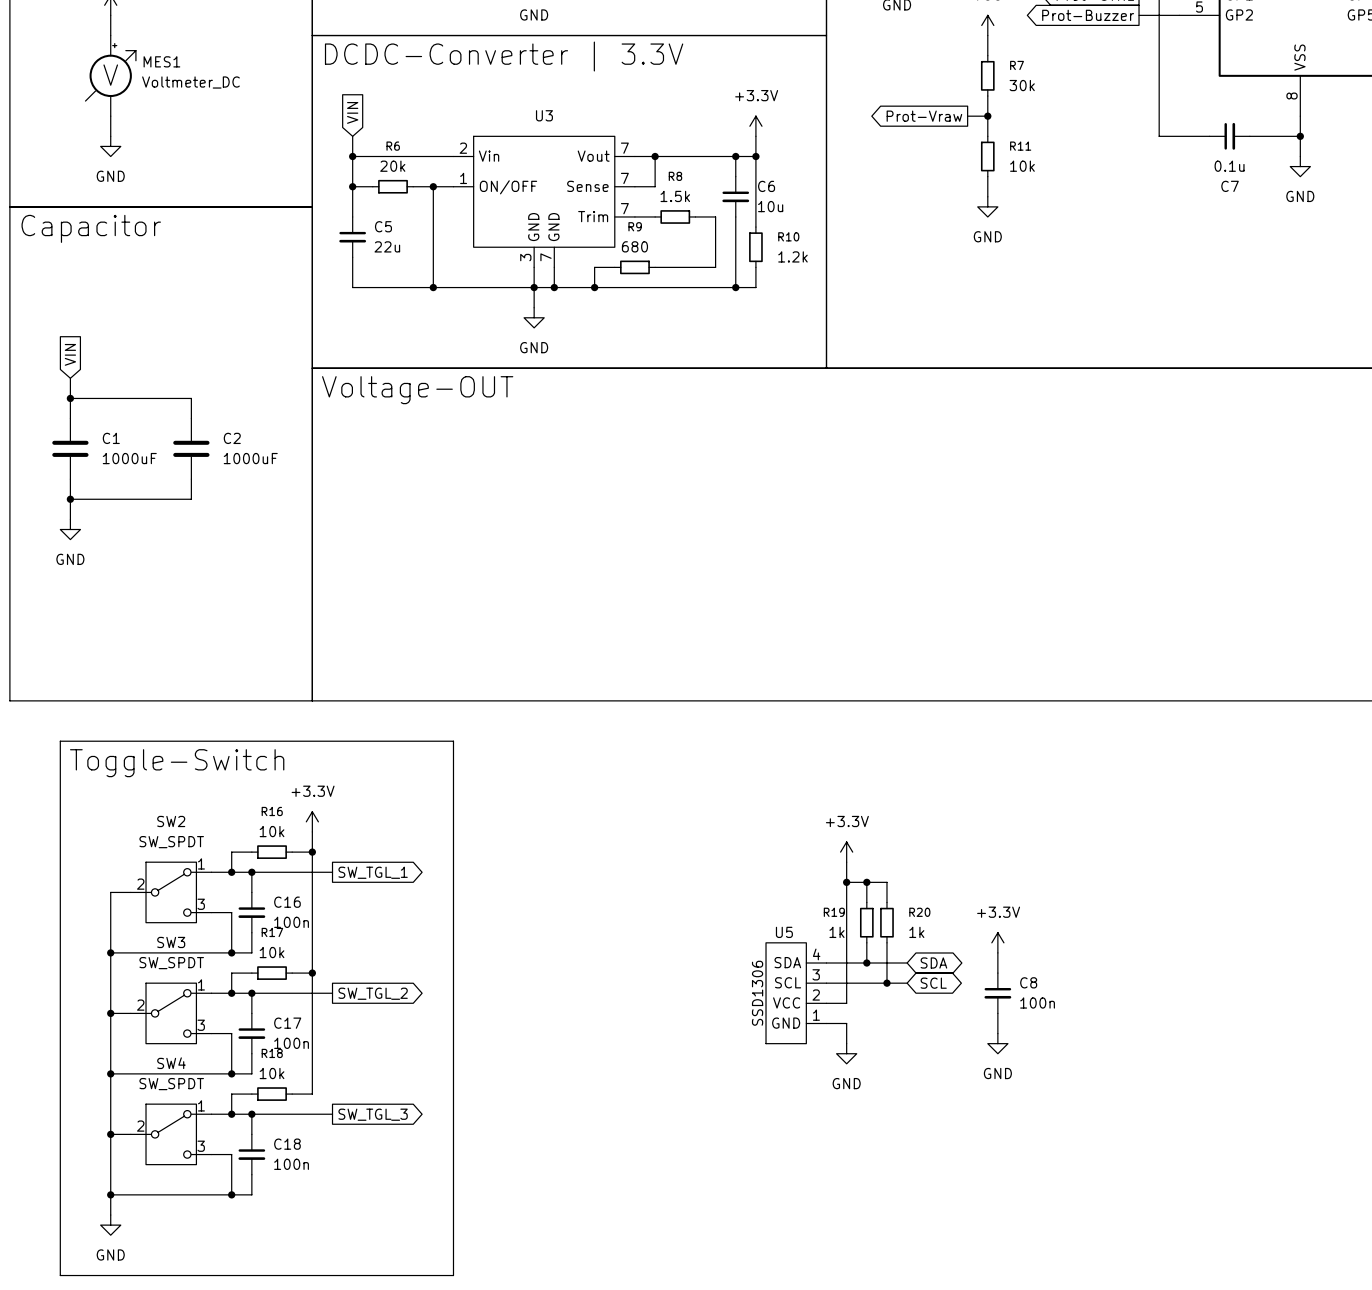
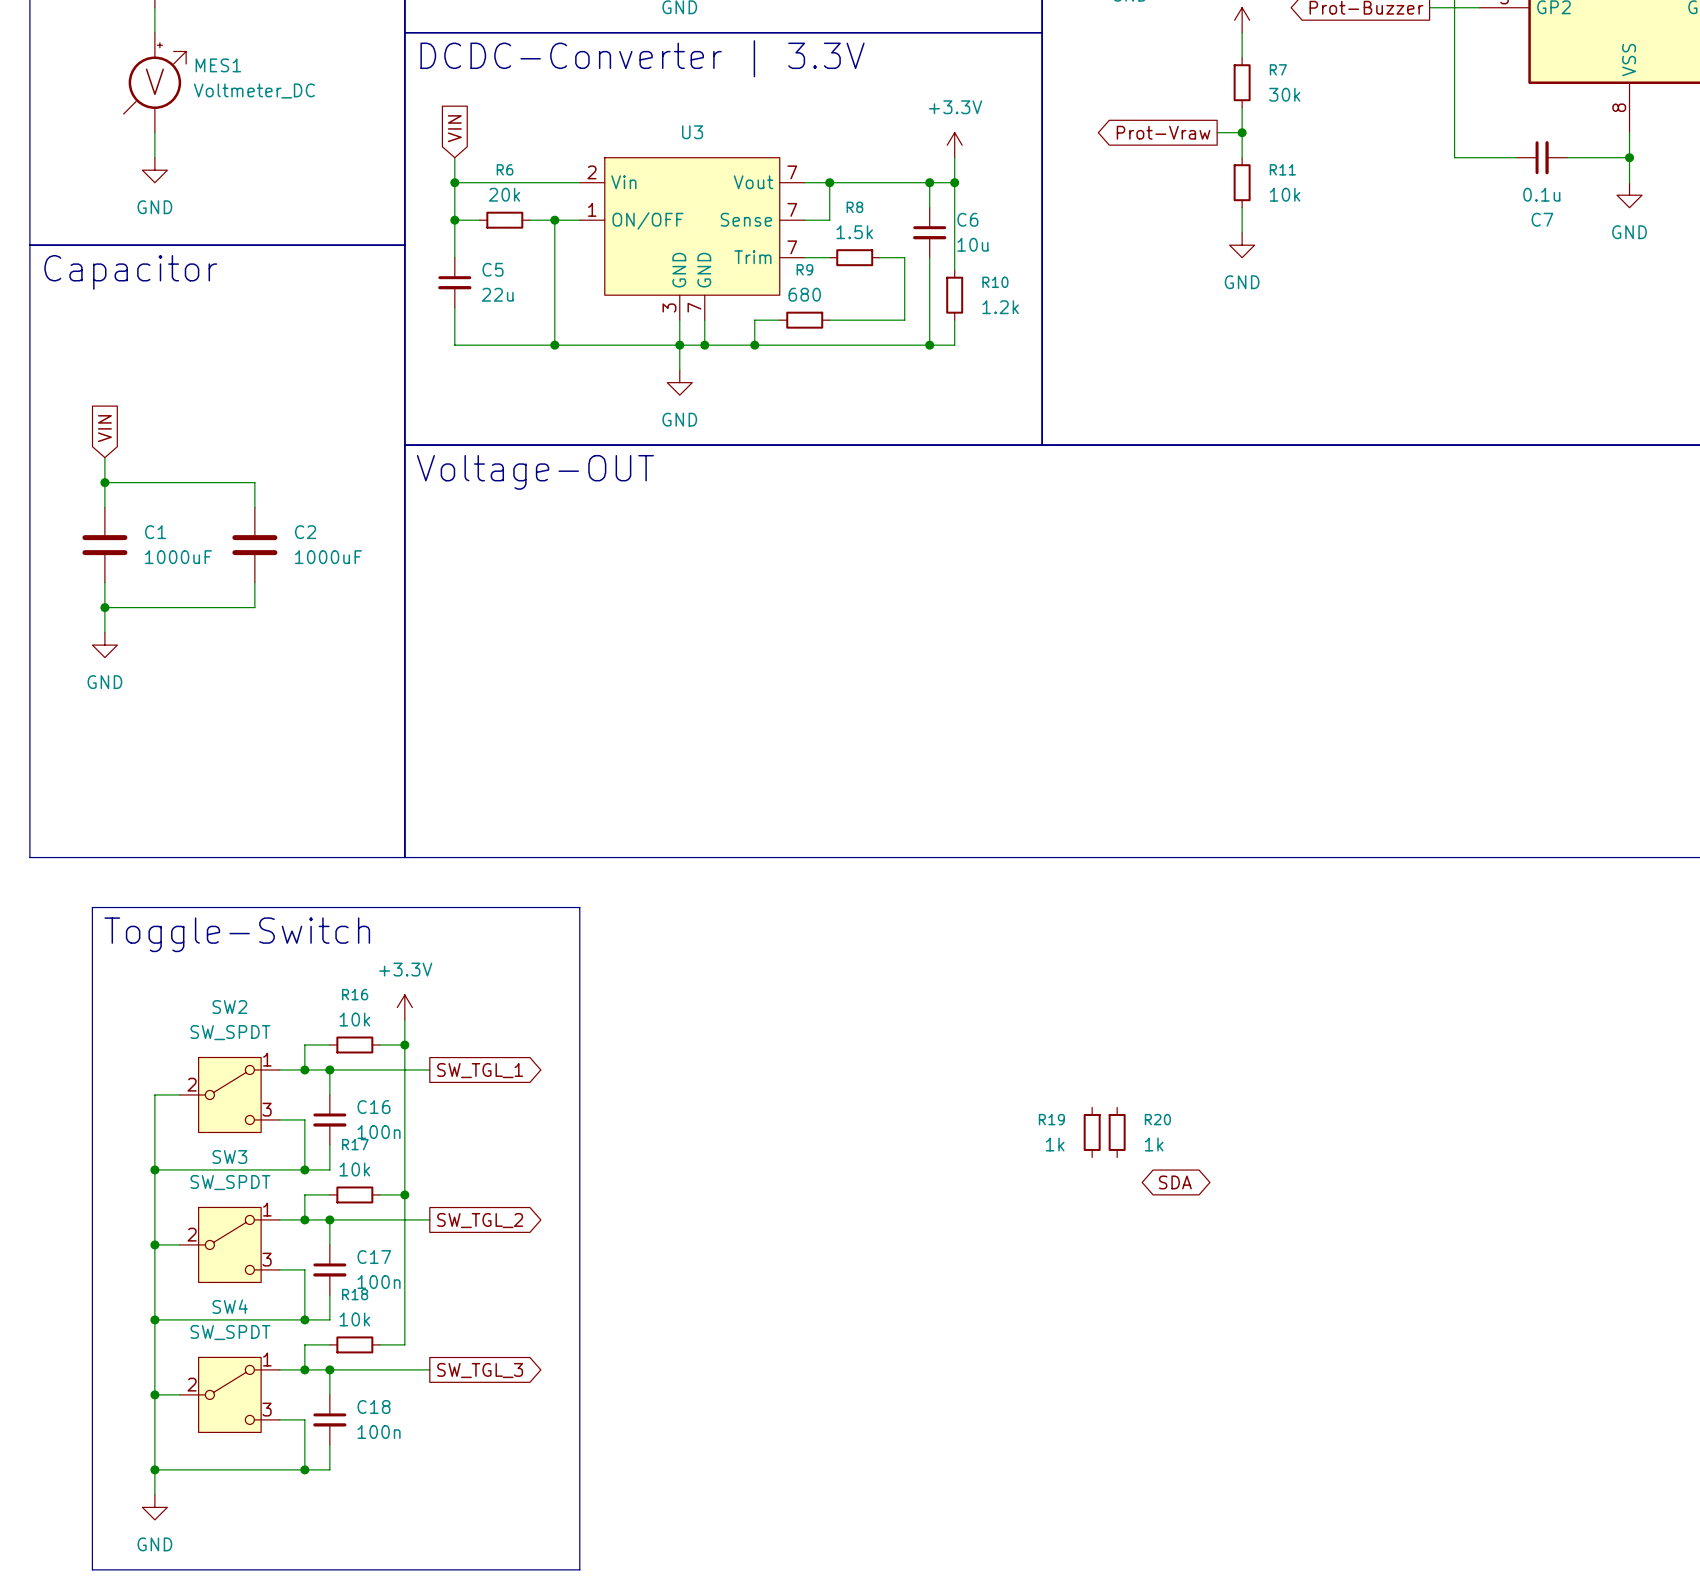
power symbol: +3.3V (846, 852) -> none
wire: (846, 862) (846, 1003) (826, 1003) -> none
wire: (846, 882) (886, 882) (886, 902) -> none
junction: (846, 882) -> none
wire: (866, 882) (866, 902) -> none
junction: (866, 882) -> none
wire: (866, 942) (866, 963) -> none
wire: (886, 942) (886, 983) -> none
power symbol: +3.3V (997, 942) -> none
wire: (997, 952) (997, 973) -> none
wire: (826, 963) (907, 963) -> none
junction: (866, 963) -> none
wire: (826, 983) (907, 983) -> none
junction: (886, 983) -> none
global label: SCL (933, 983) -> none
U5: (796, 993) -> none
C8: 100n (997, 993) -> none
wire: (997, 1013) (997, 1033) -> none
wire: (826, 1023) (846, 1023) (846, 1043) -> none
power symbol: GND (997, 1043) -> none
power symbol: GND (846, 1053) -> none

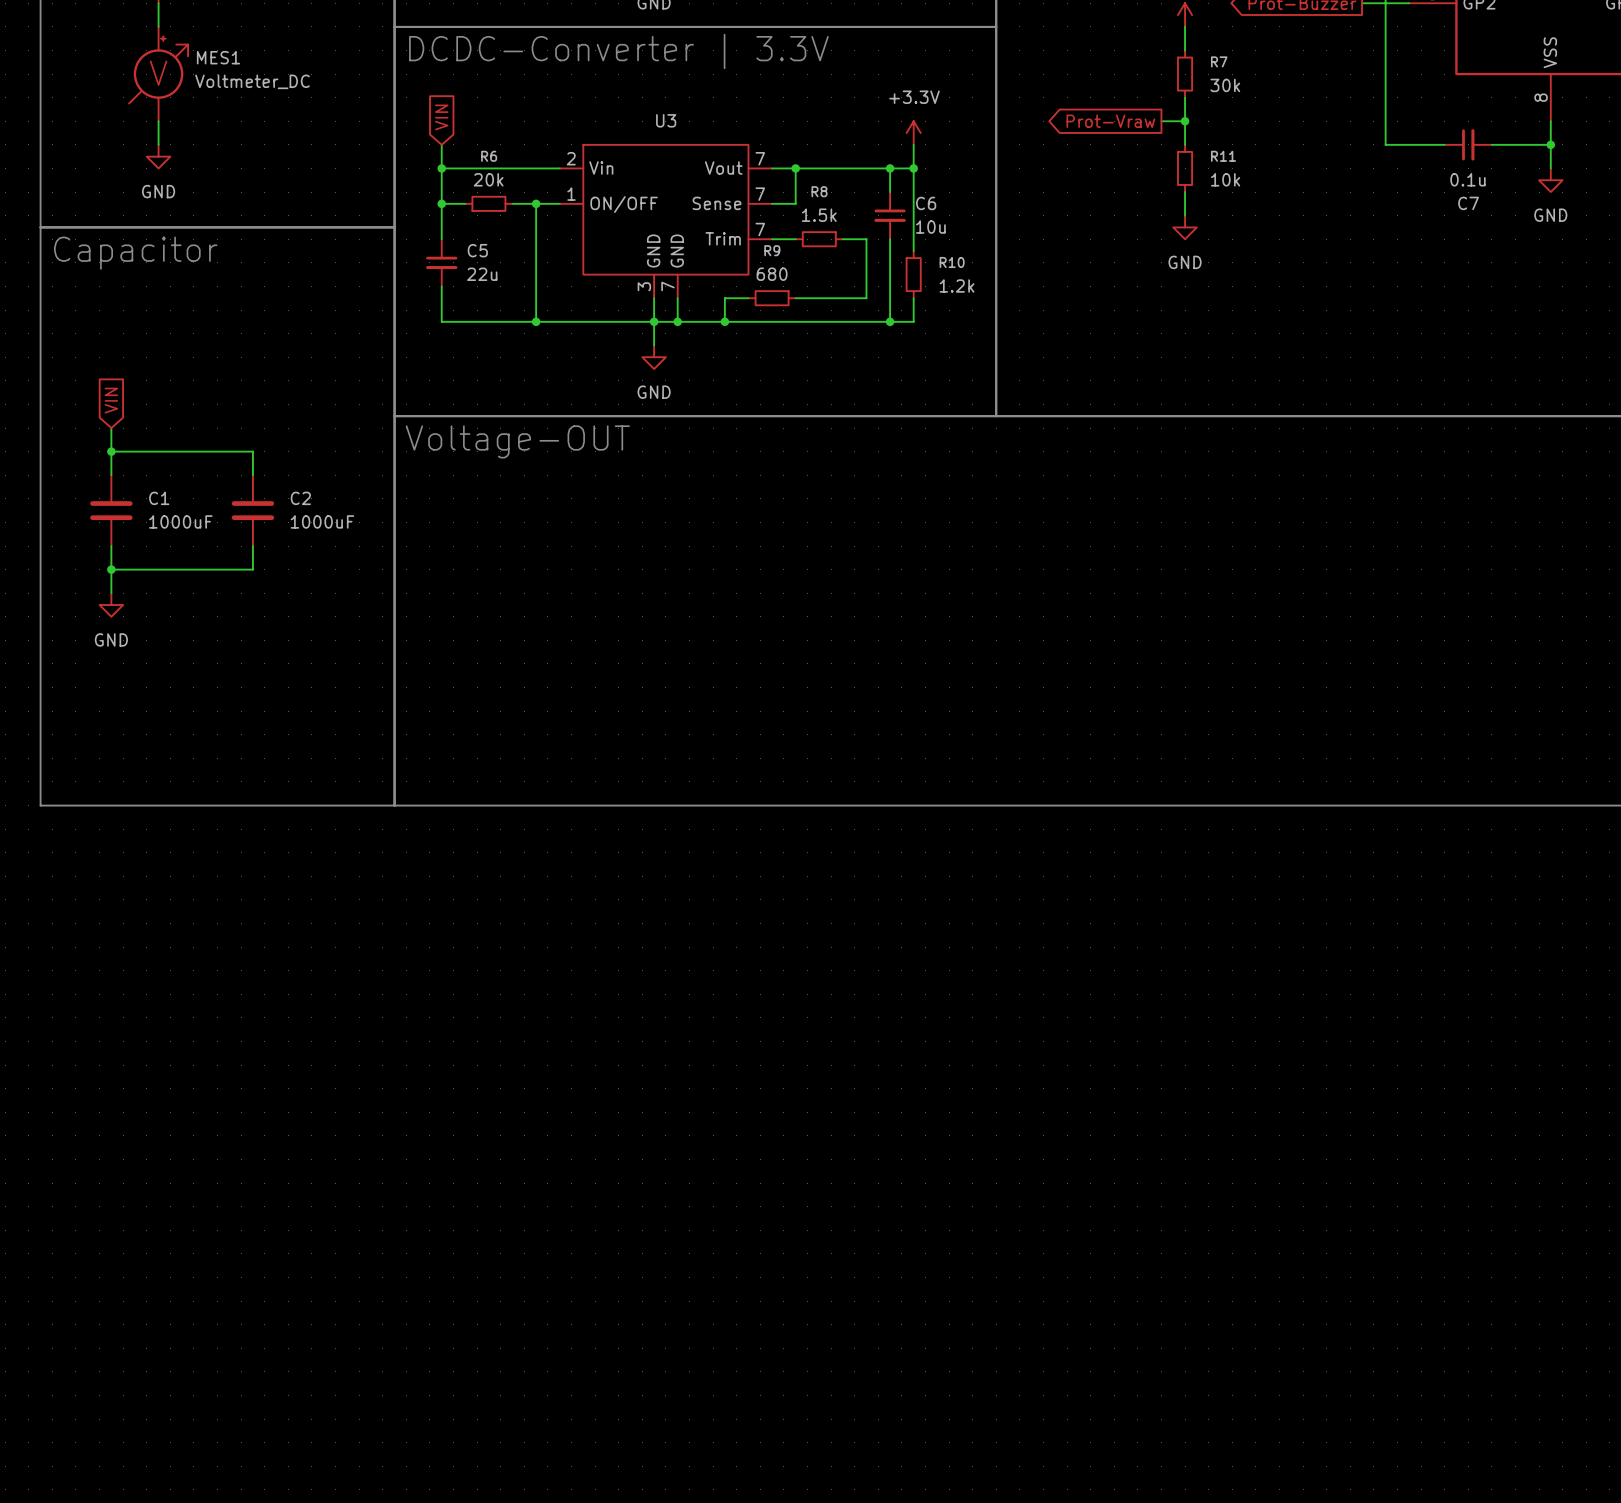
line: (92, 907) (579, 907) (579, 1569) (92, 1569) (92, 907) -> none
text: Toggle-Switch (237, 934) -> none
power symbol: +3.3V (404, 1007) -> none
wire: (404, 1020) (404, 1344) (379, 1344) -> none
wire: (329, 1044) (304, 1044) (304, 1069) -> none
R16: 10k (354, 1044) -> none
wire: (379, 1044) (404, 1044) -> none
junction: (404, 1044) -> none
wire: (279, 1069) (429, 1069) -> none
junction: (304, 1069) -> none
wire: (329, 1069) (329, 1094) -> none
junction: (329, 1069) -> none
global label: SW_TGL_1 (480, 1070) -> none
wire: (179, 1094) (154, 1094) (154, 1494) -> none
SW2: SW_SPDT (229, 1094) -> none
wire: (279, 1119) (304, 1119) (304, 1169) -> none
C16: 100n (329, 1119) -> none
R19: 1k (1092, 1132) -> none
R20: 1k (1117, 1132) -> none
wire: (329, 1144) (329, 1169) (154, 1169) -> none
junction: (154, 1169) -> none
junction: (304, 1169) -> none
global label: SDA (1175, 1182) -> none
wire: (329, 1194) (304, 1194) (304, 1219) -> none
R17: 10k (354, 1194) -> none
wire: (379, 1194) (404, 1194) -> none
junction: (404, 1194) -> none
wire: (279, 1219) (429, 1219) -> none
junction: (304, 1219) -> none
wire: (329, 1219) (329, 1244) -> none
junction: (329, 1219) -> none
global label: SW_TGL_2 (480, 1220) -> none
wire: (154, 1244) (179, 1244) -> none
junction: (154, 1244) -> none
SW3: SW_SPDT (229, 1244) -> none
wire: (279, 1269) (304, 1269) (304, 1319) -> none
C17: 100n (329, 1269) -> none
wire: (329, 1294) (329, 1319) (154, 1319) -> none
junction: (154, 1319) -> none
junction: (304, 1319) -> none
wire: (329, 1344) (304, 1344) (304, 1369) -> none
R18: 10k (354, 1344) -> none
wire: (279, 1369) (429, 1369) -> none
junction: (304, 1369) -> none
wire: (329, 1369) (329, 1394) -> none
junction: (329, 1369) -> none
global label: SW_TGL_3 (480, 1370) -> none
wire: (154, 1394) (179, 1394) -> none
junction: (154, 1394) -> none
SW4: SW_SPDT (229, 1394) -> none
wire: (279, 1419) (304, 1419) (304, 1469) -> none
C18: 100n (329, 1419) -> none
wire: (329, 1444) (329, 1469) (154, 1469) -> none
junction: (154, 1469) -> none
junction: (304, 1469) -> none
power symbol: GND (154, 1507) -> none

